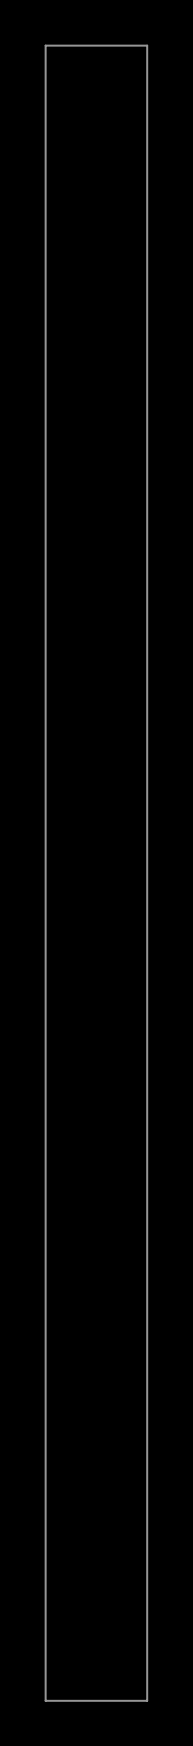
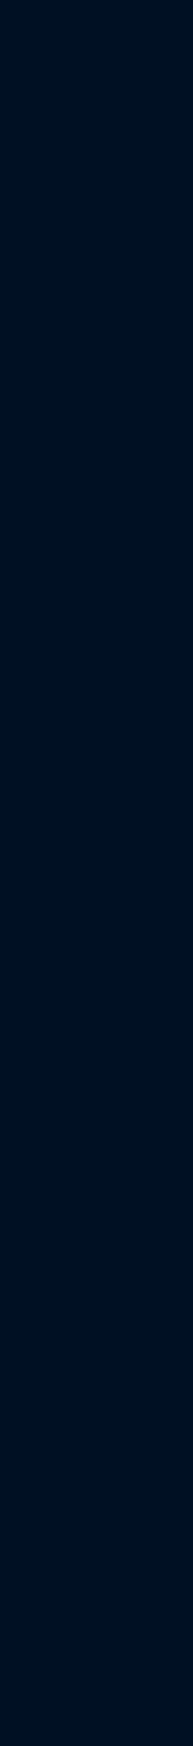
line: (45, 45) (147, 45) (147, 1700) (45, 1700) (45, 45) -> none

